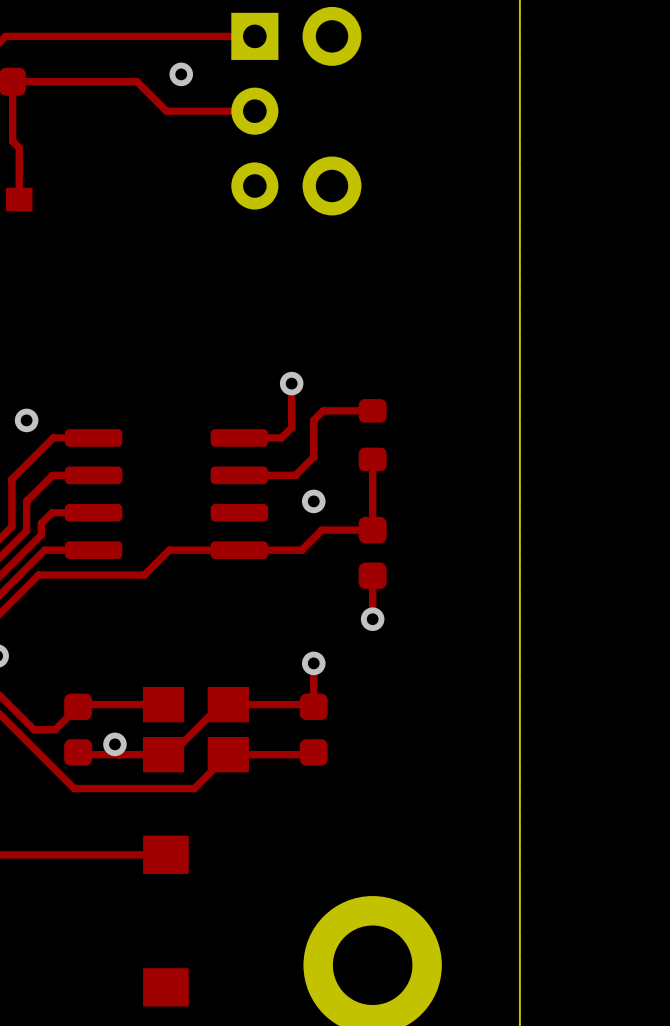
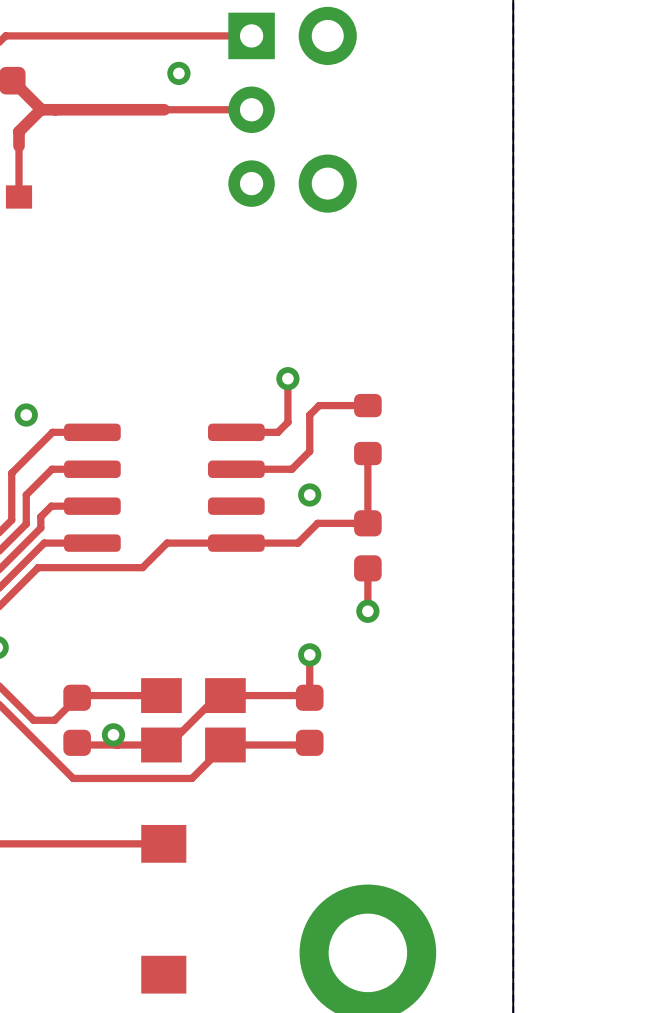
top track: none -> (12, 80) (40, 109)
top track: none -> (40, 109) (19, 131) (19, 146)
top track: (166, 111) (137, 81) (12, 81) (12, 141) (19, 148) -> (164, 109) (40, 109)

